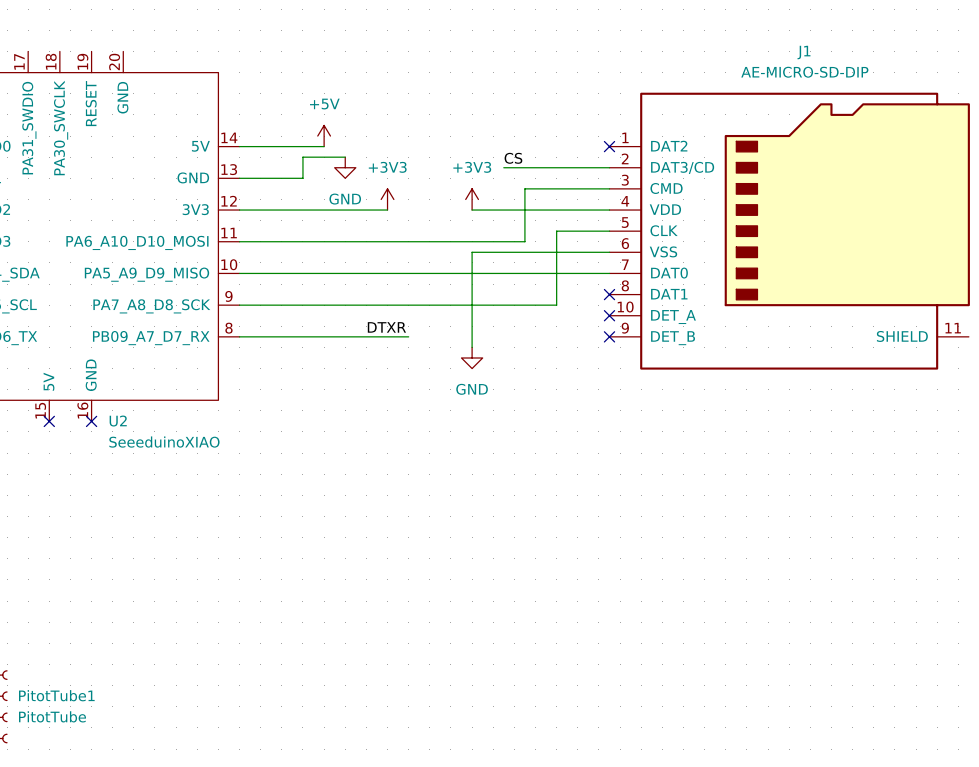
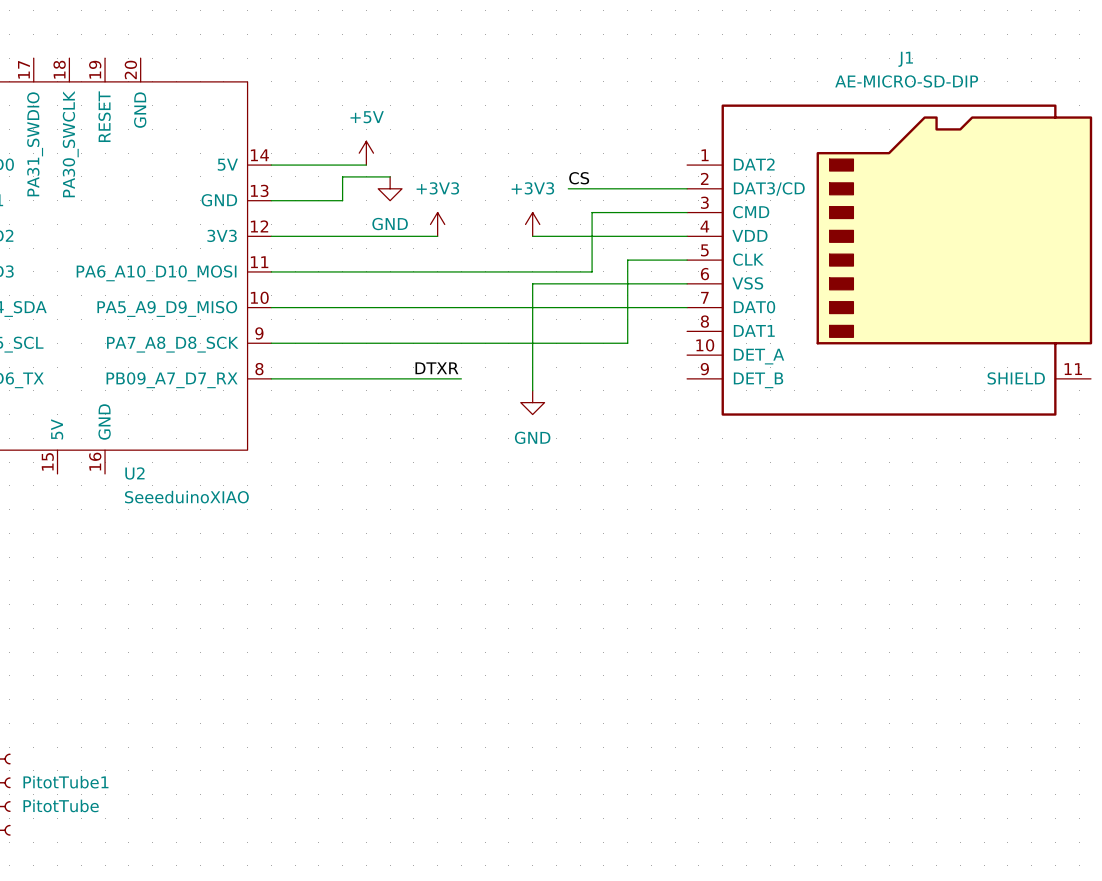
no-connect mark: (609, 146) -> none
no-connect mark: (609, 294) -> none
no-connect mark: (609, 315) -> none
no-connect mark: (609, 336) -> none
no-connect mark: (49, 421) -> none
no-connect mark: (91, 421) -> none

